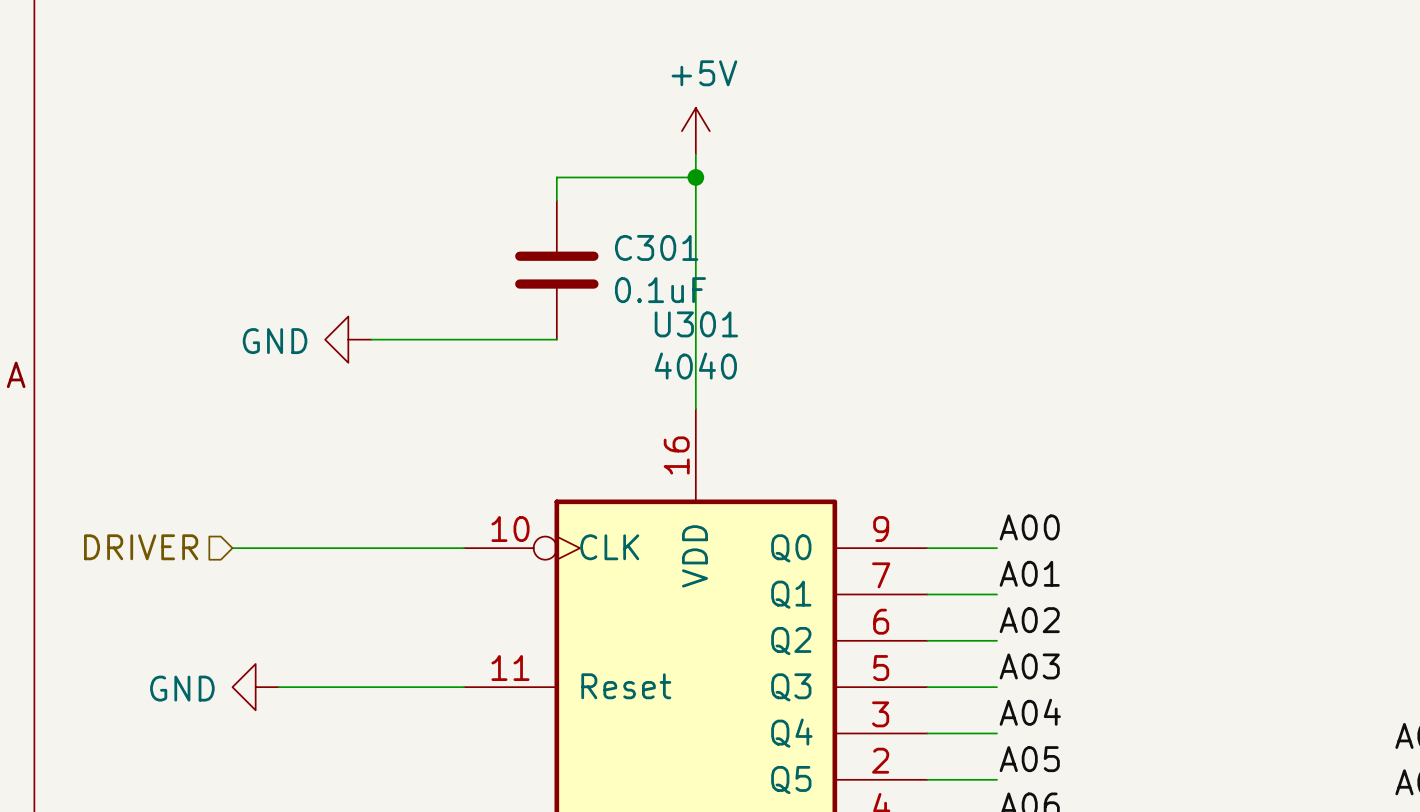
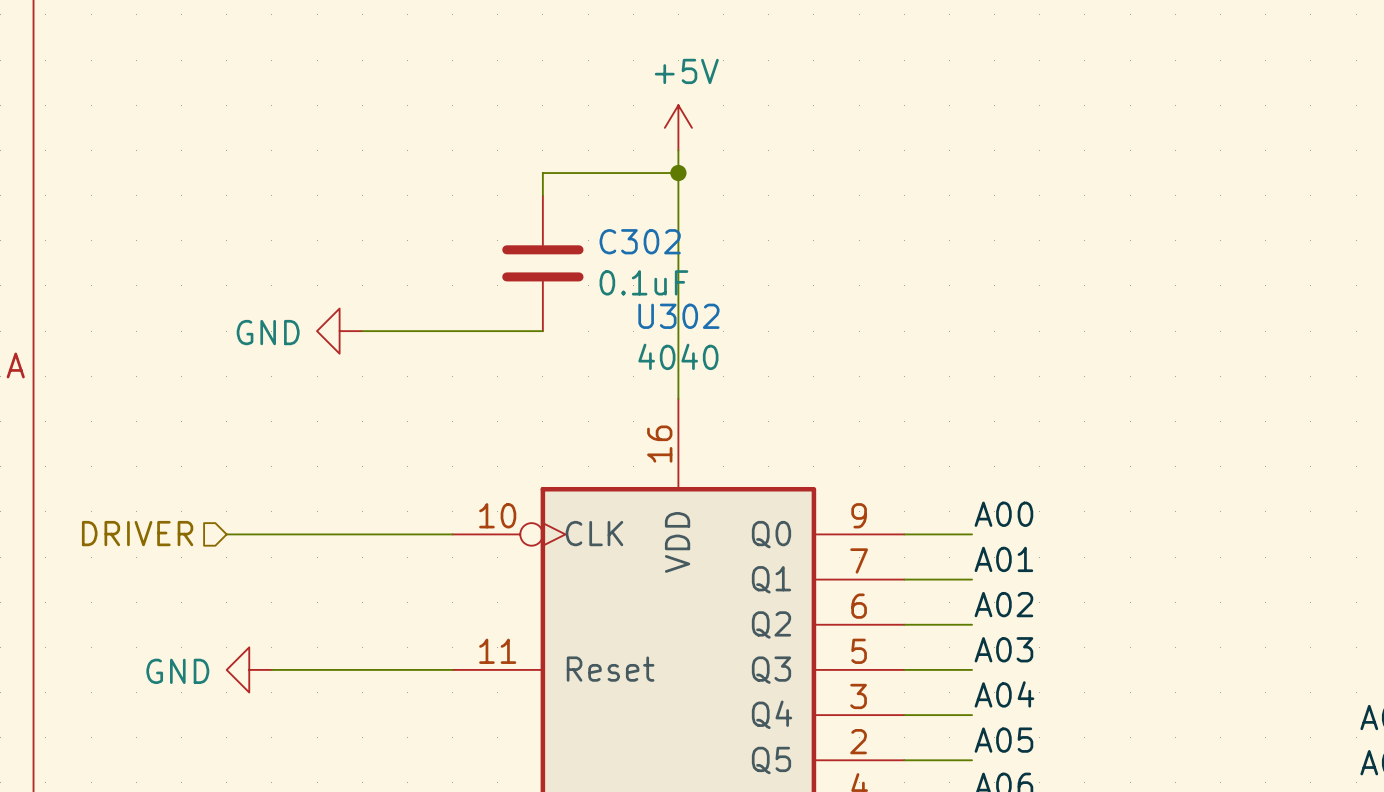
C301 name: C301 (656, 247) -> C302 (640, 241)
U301 name: U301 (696, 324) -> U302 (678, 316)

